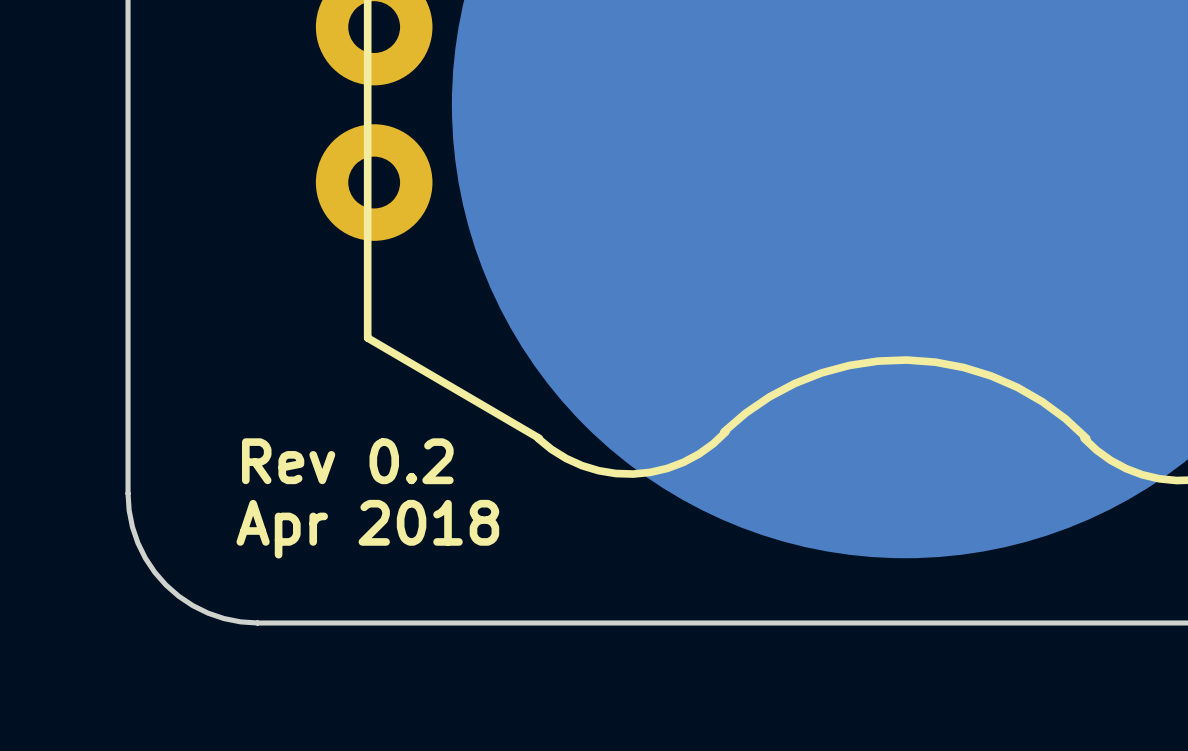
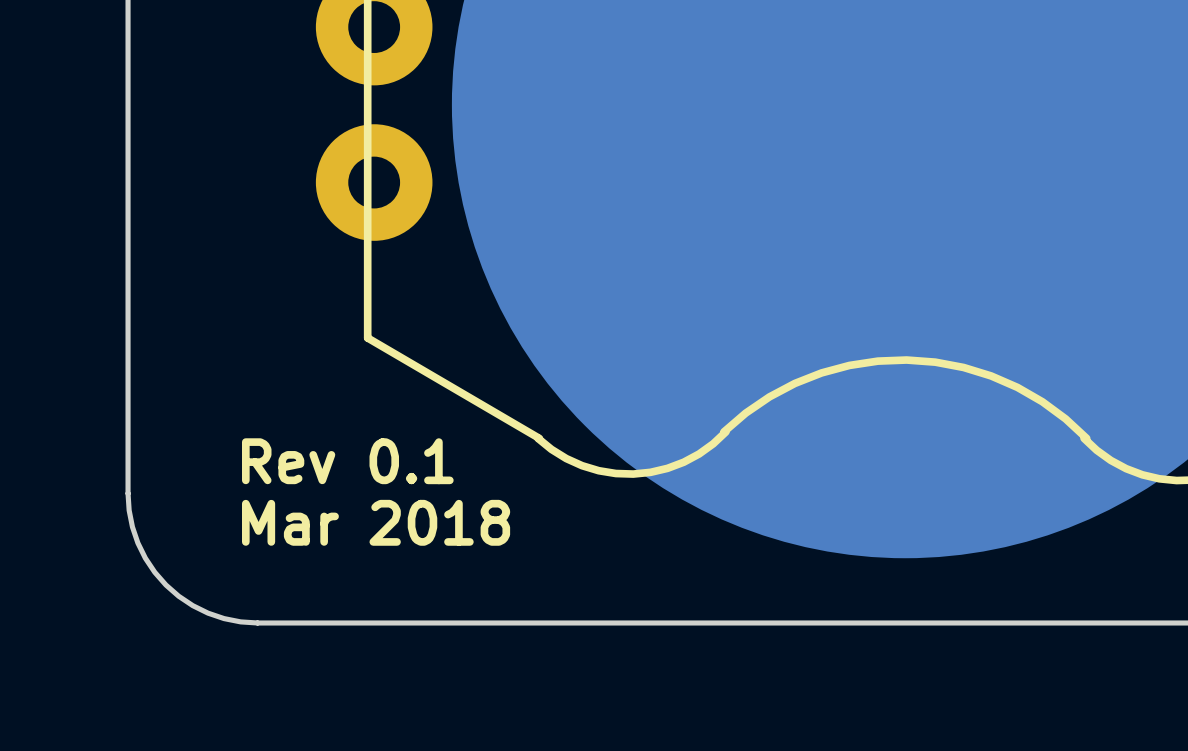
text: Rev 0.2 (347, 461) -> Rev 0.1 (347, 461)
text: Apr 2018 (367, 529) -> Mar 2018 (376, 522)

